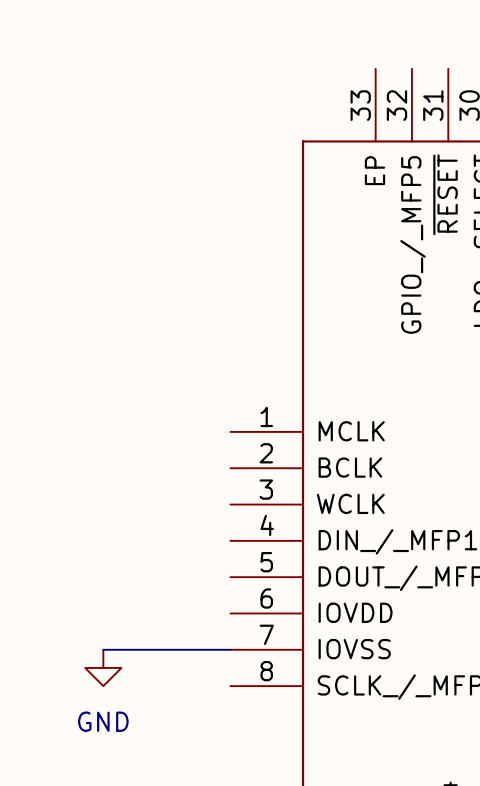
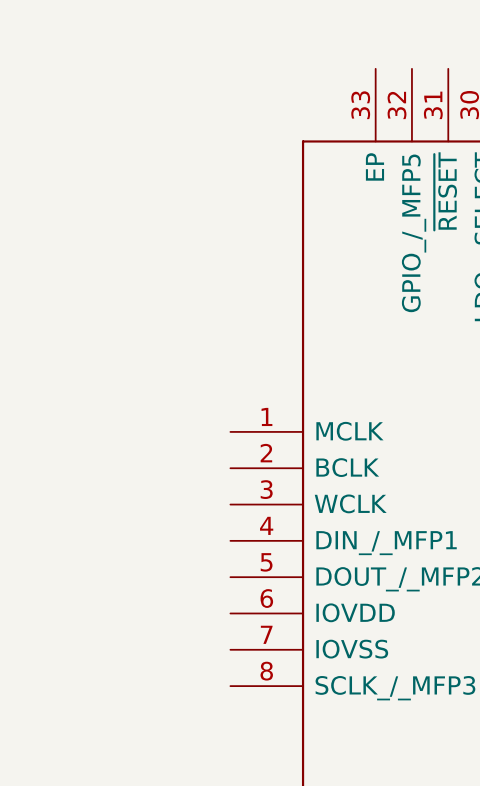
wire: (103, 649) (230, 649) -> none
power symbol: GND (103, 667) -> none

